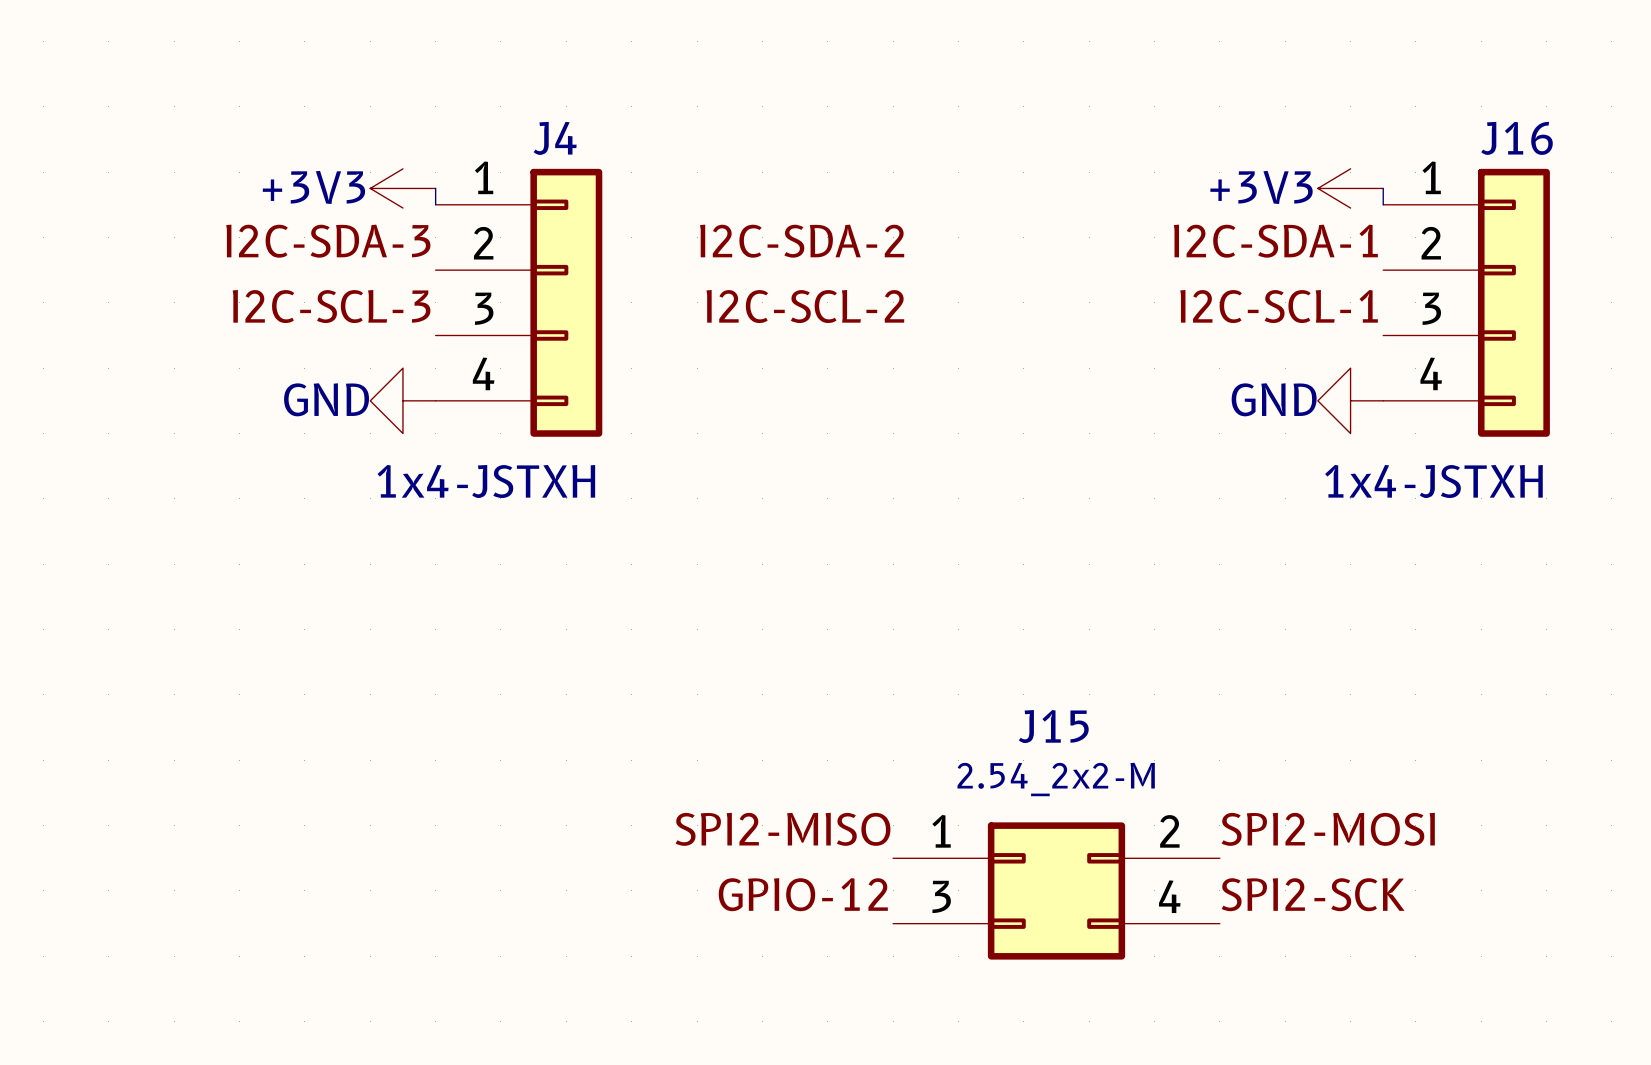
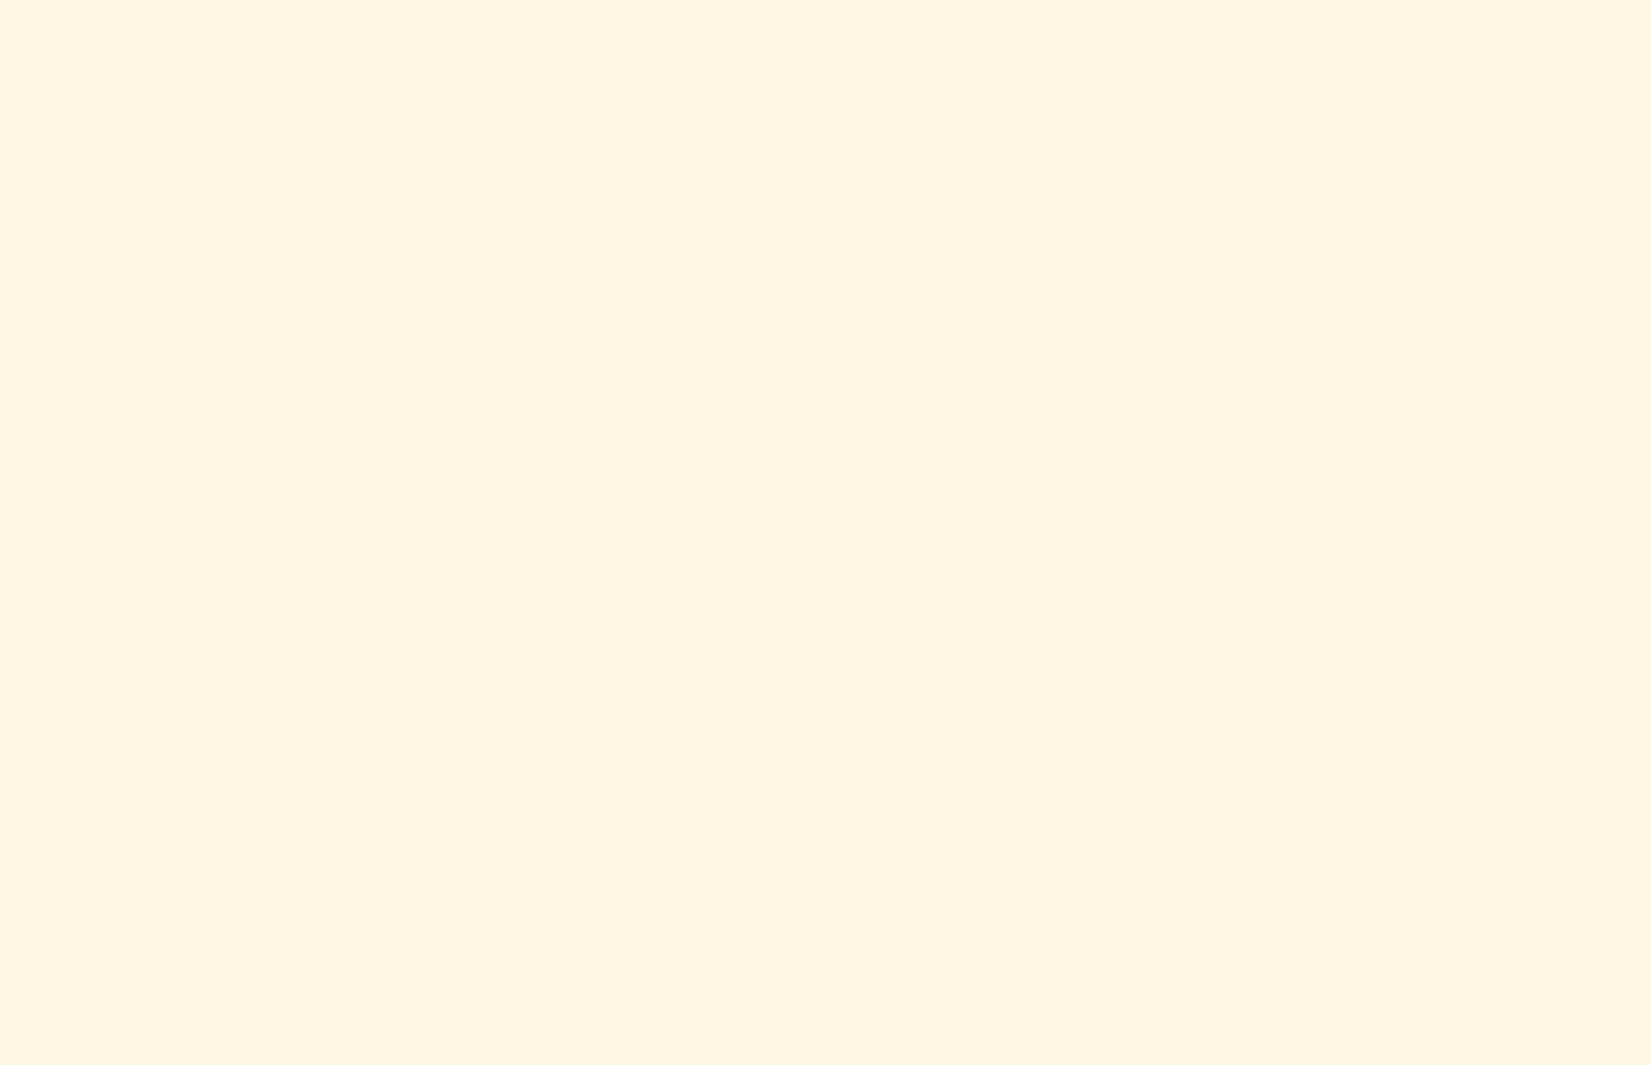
power symbol: +3V3 (402, 188) -> none
wire: (435, 188) (435, 204) -> none
power symbol: +3V3 (1350, 188) -> none
wire: (1383, 188) (1383, 204) -> none
label: I2C-SDA-3 (328, 241) -> none
label: I2C-SDA-2 (802, 241) -> none
label: I2C-SDA-1 (1275, 241) -> none
J4: 1x4-JSTXH (518, 302) -> none
J16: 1x4-JSTXH (1466, 302) -> none
label: I2C-SCL-3 (331, 306) -> none
label: I2C-SCL-2 (805, 306) -> none
label: I2C-SCL-1 (1279, 306) -> none
power symbol: GND (402, 400) -> none
power symbol: GND (1350, 400) -> none
label: SPI2-MISO (783, 829) -> none
label: SPI2-MOSI (1328, 829) -> none
J15: 2.54_2x2-M (1056, 890) -> none
label: GPIO-12 (803, 894) -> none
label: SPI2-SCK (1313, 894) -> none

